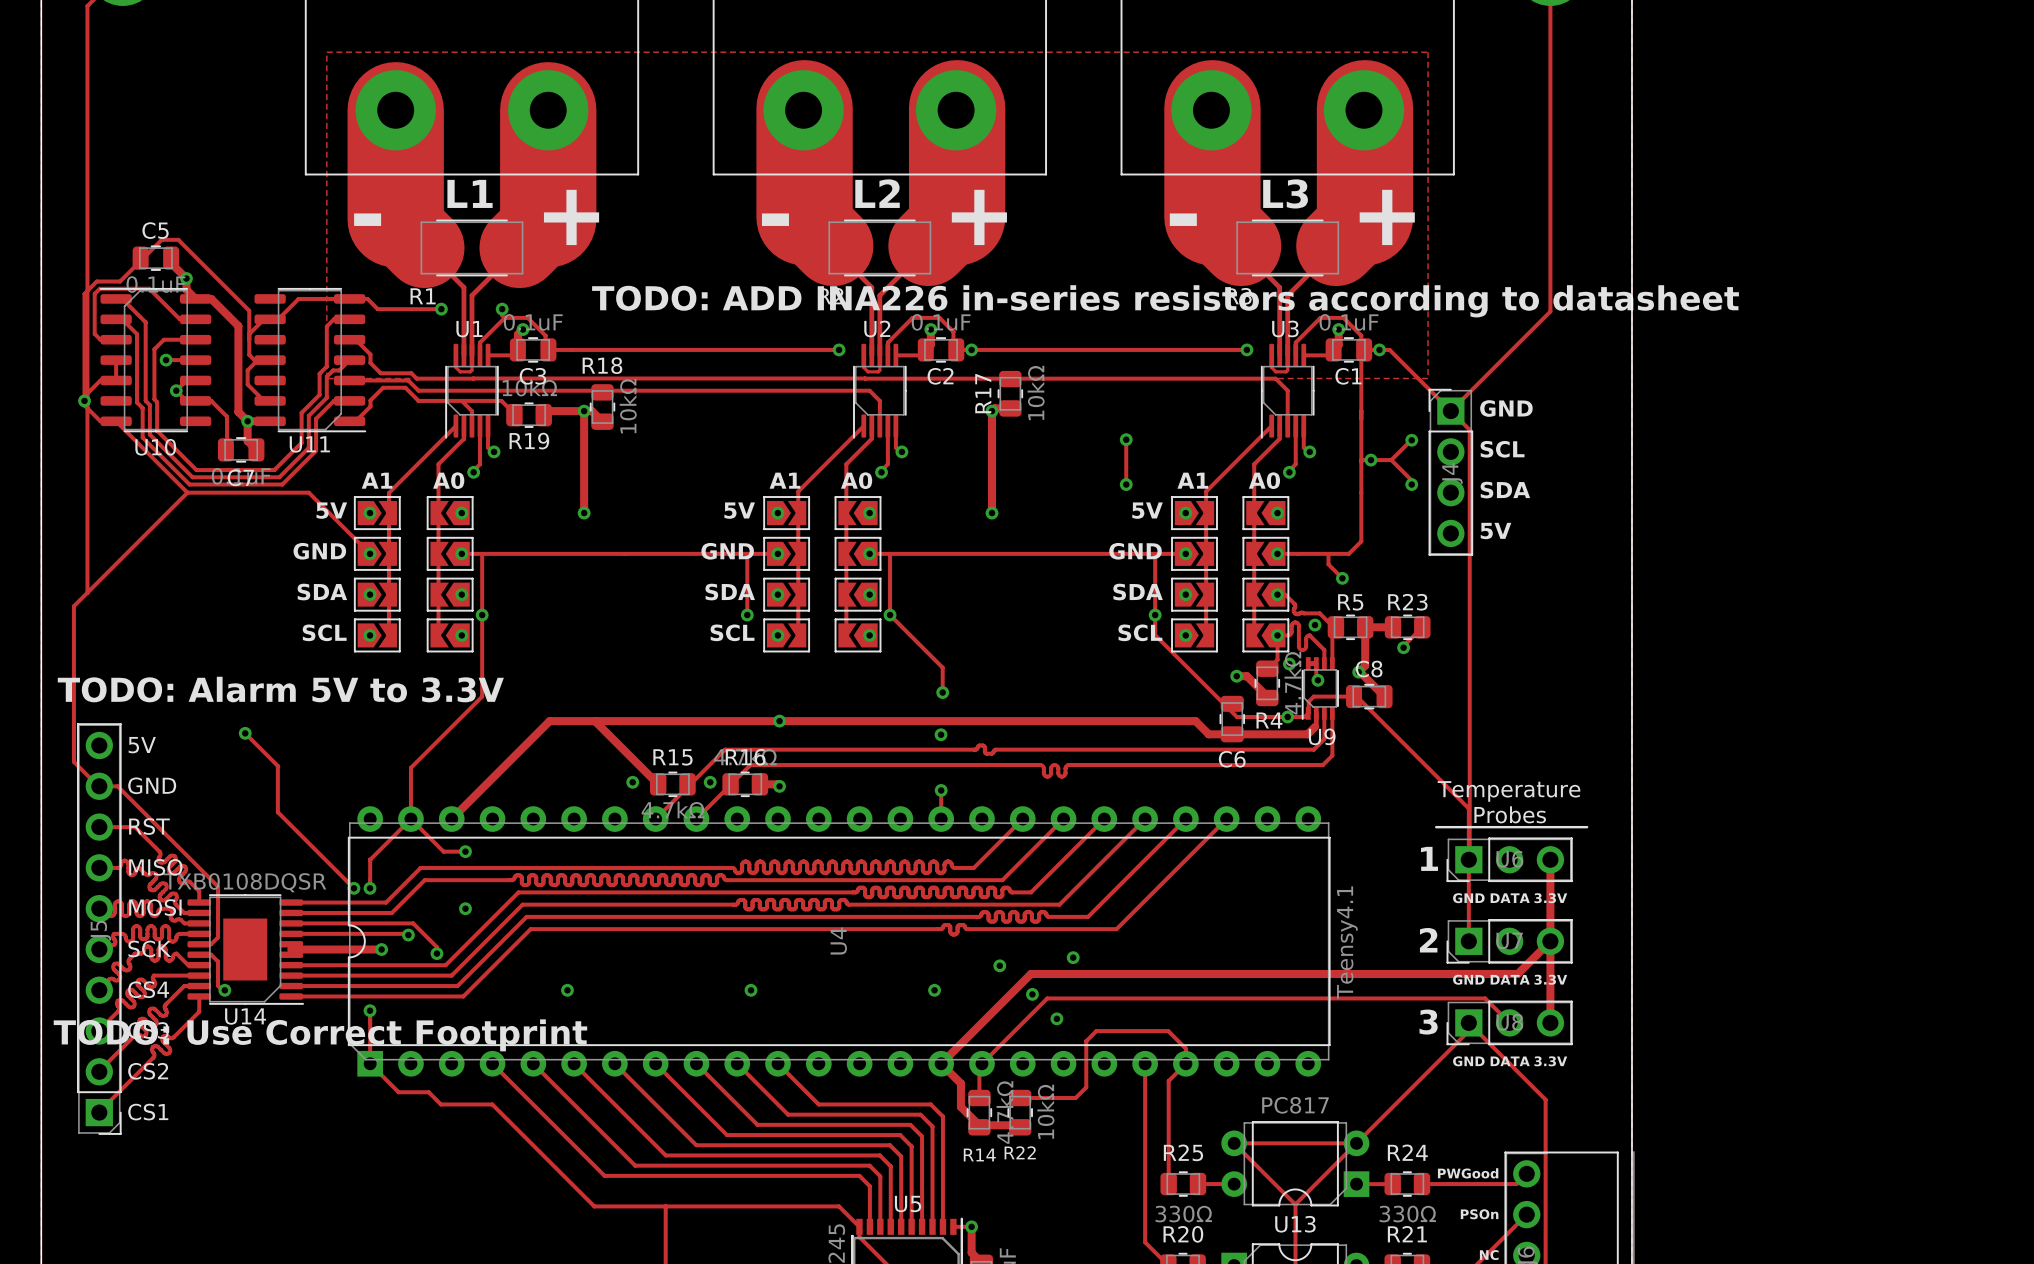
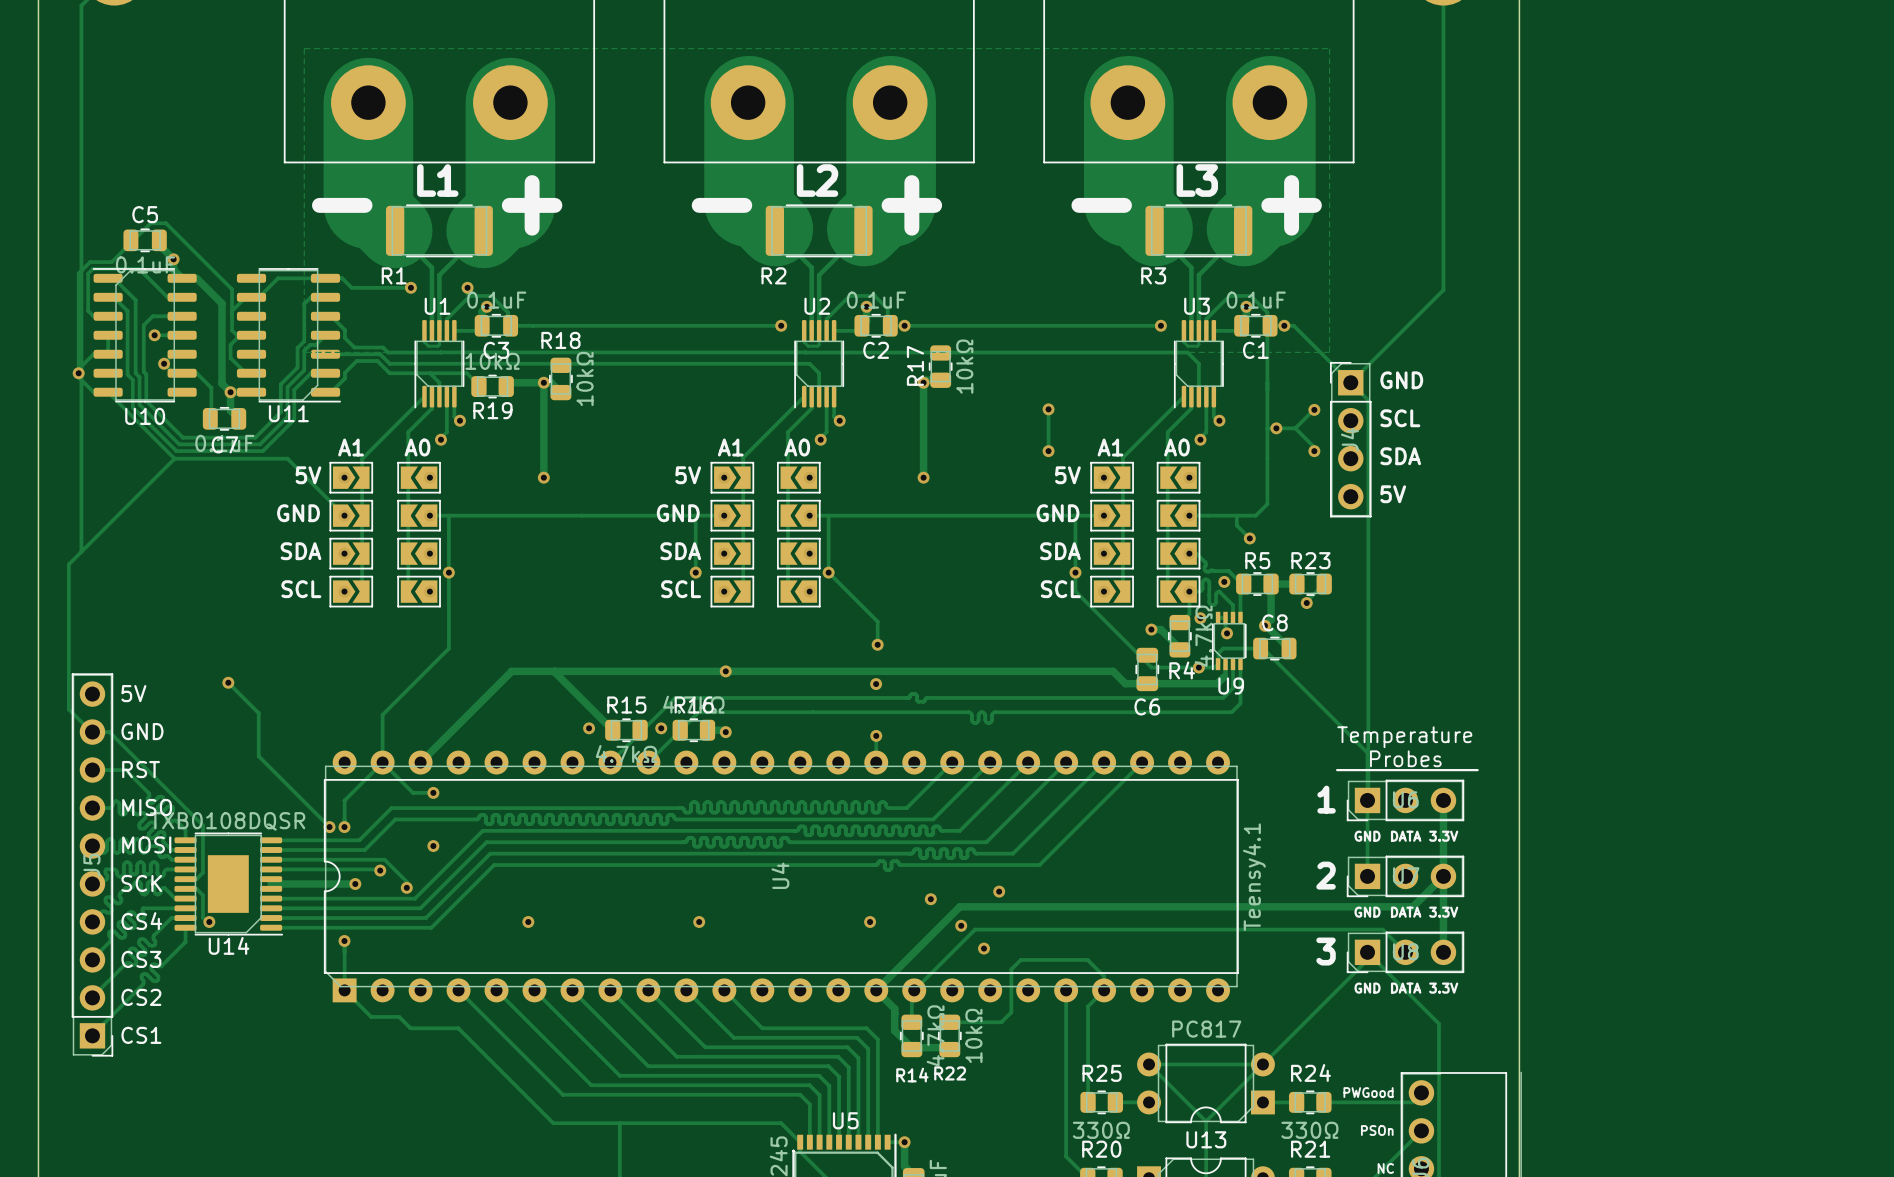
text: TODO: ADD INA226 in-series resistors according to datasheet (1165, 301) -> none
text: TODO: Alarm 5V to 3.3V (280, 689) -> none
text: TODO: Use Correct Footprint (320, 1035) -> none

